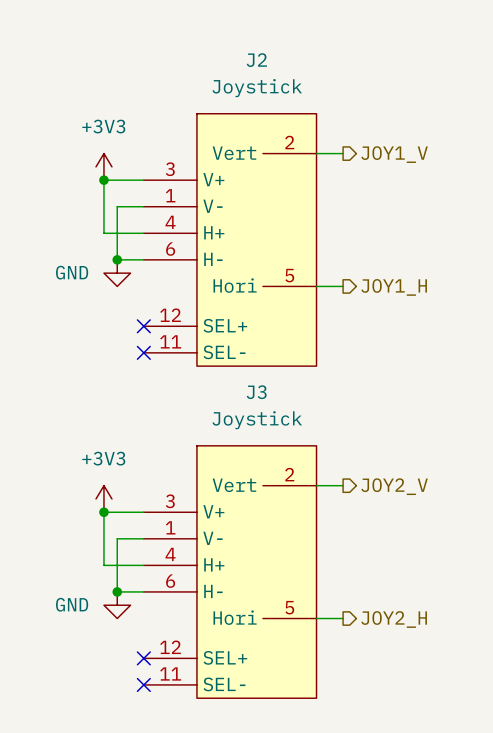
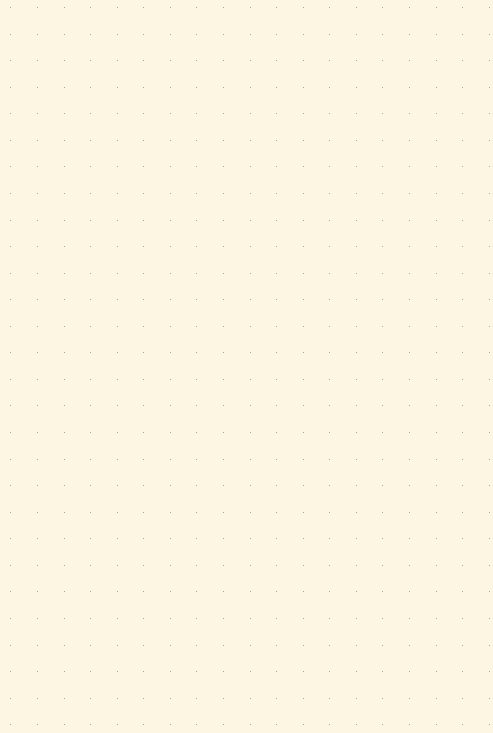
wire: (316, 153) (343, 153) -> none
hierarchical label: JOY1_V (394, 154) -> none
power symbol: +3V3 (103, 166) -> none
junction: (103, 180) -> none
wire: (143, 180) (103, 180) (103, 233) (143, 233) -> none
wire: (143, 206) (117, 206) (117, 259) (143, 259) -> none
J2: Joystick (230, 239) -> none
junction: (117, 259) -> none
power symbol: GND (117, 273) -> none
wire: (316, 286) (343, 286) -> none
hierarchical label: JOY1_H (394, 287) -> none
no-connect mark: (143, 326) -> none
no-connect mark: (143, 352) -> none
wire: (316, 485) (343, 485) -> none
hierarchical label: JOY2_V (394, 486) -> none
power symbol: +3V3 (103, 498) -> none
junction: (103, 512) -> none
wire: (143, 512) (103, 512) (103, 565) (143, 565) -> none
wire: (143, 538) (117, 538) (117, 591) (143, 591) -> none
J3: Joystick (230, 572) -> none
junction: (117, 591) -> none
power symbol: GND (117, 605) -> none
wire: (316, 618) (343, 618) -> none
hierarchical label: JOY2_H (394, 619) -> none
no-connect mark: (143, 658) -> none
no-connect mark: (143, 684) -> none

